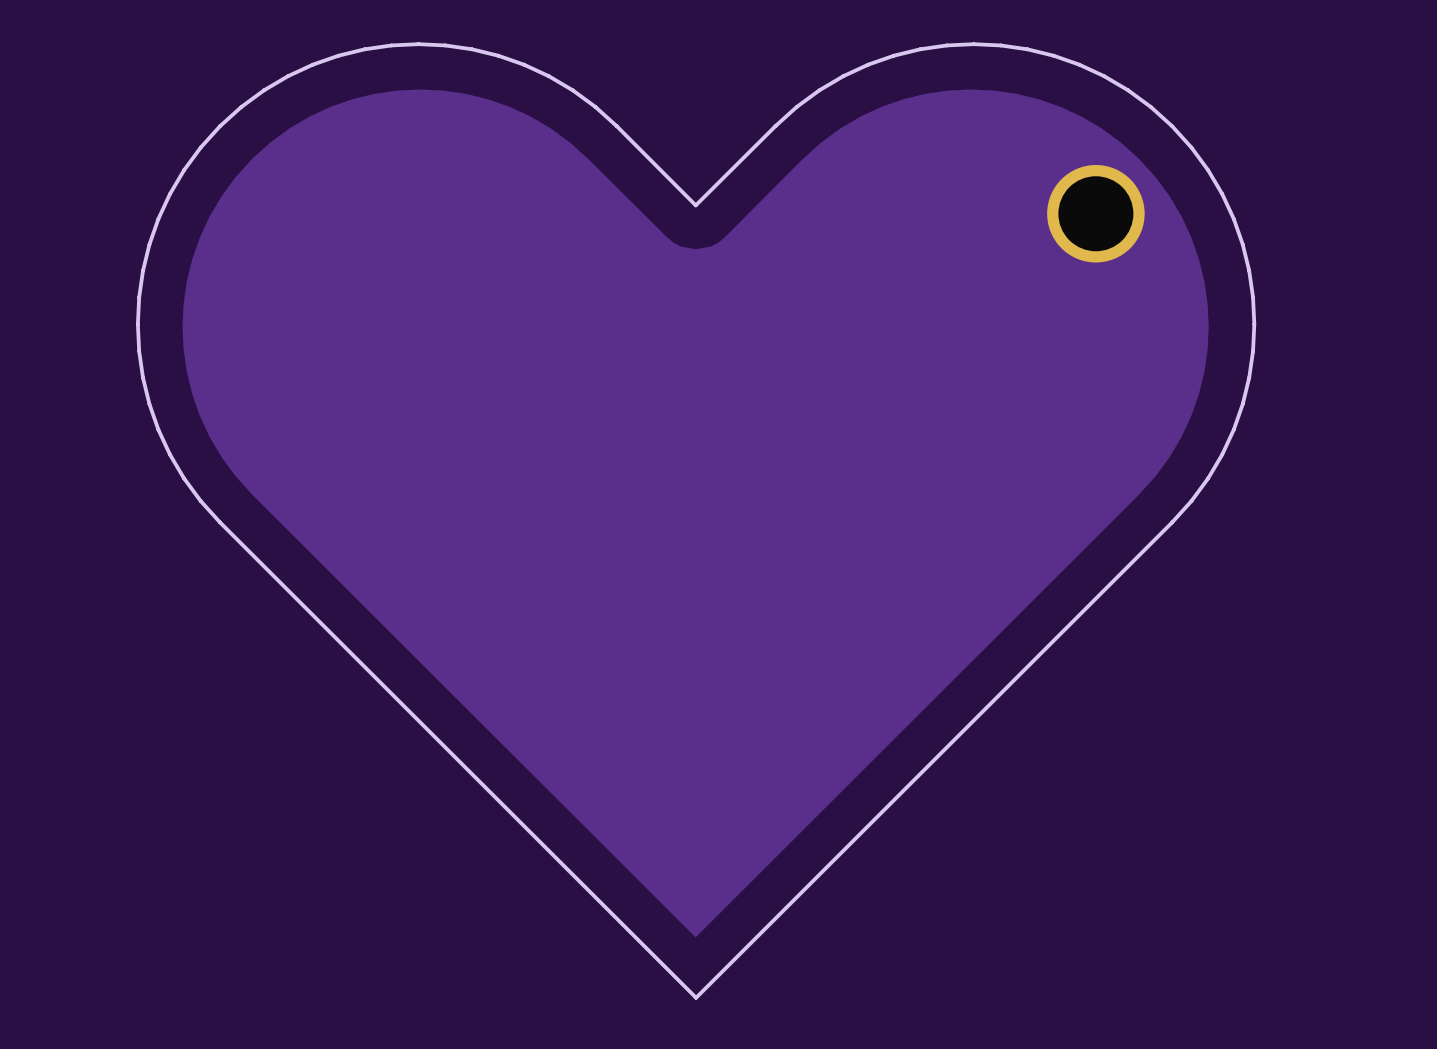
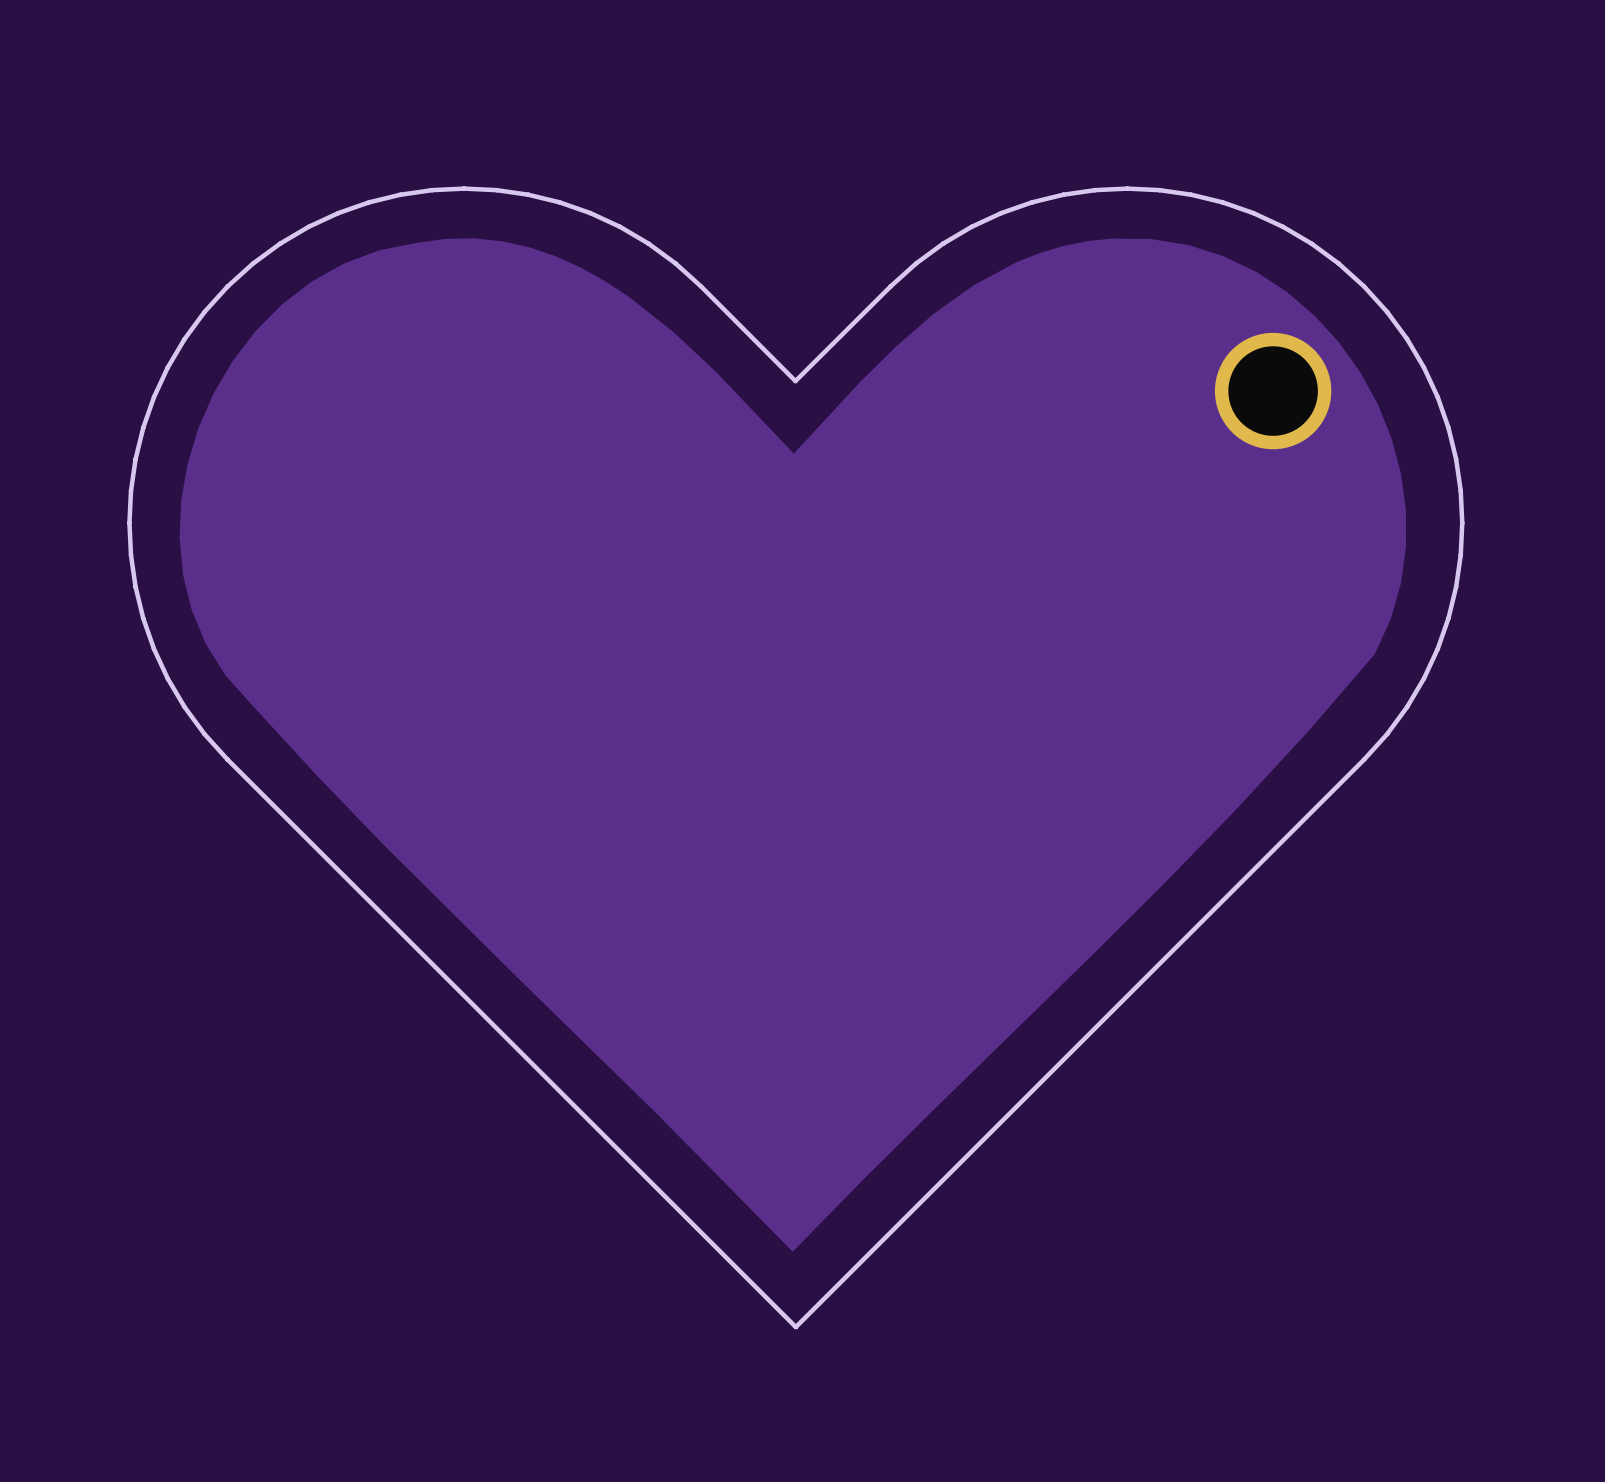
drawing shape: [182, 89, 1209, 938] -> [179, 238, 1406, 1252]

